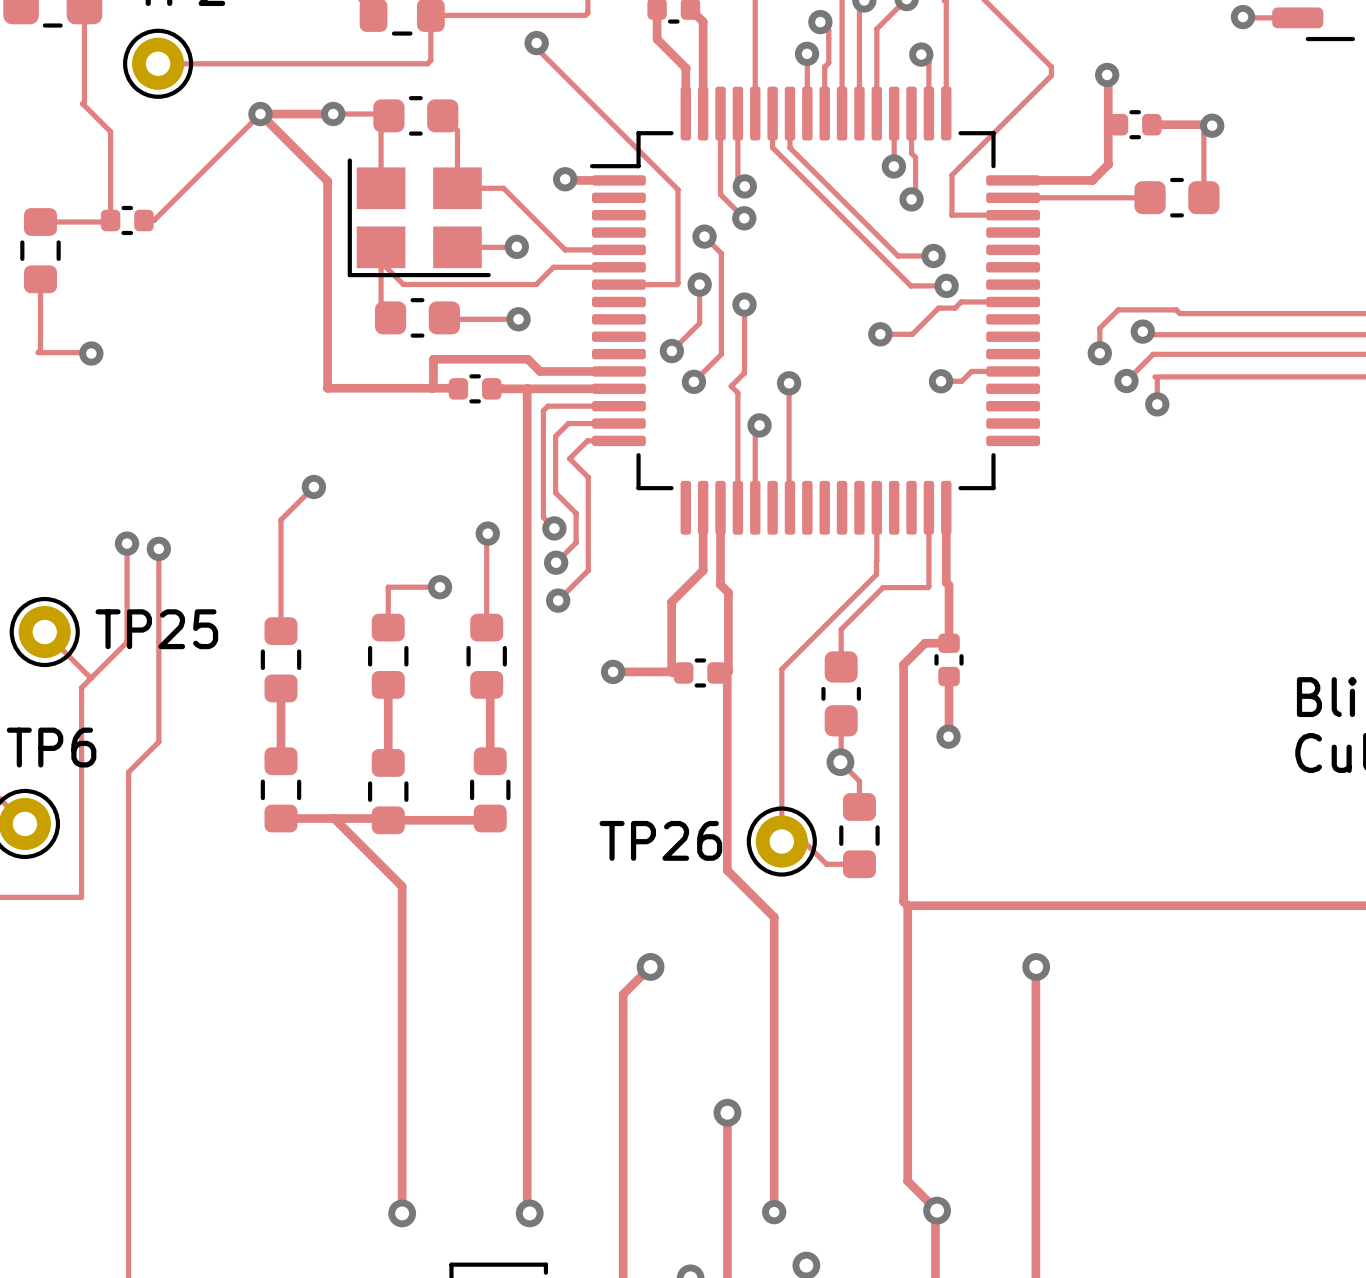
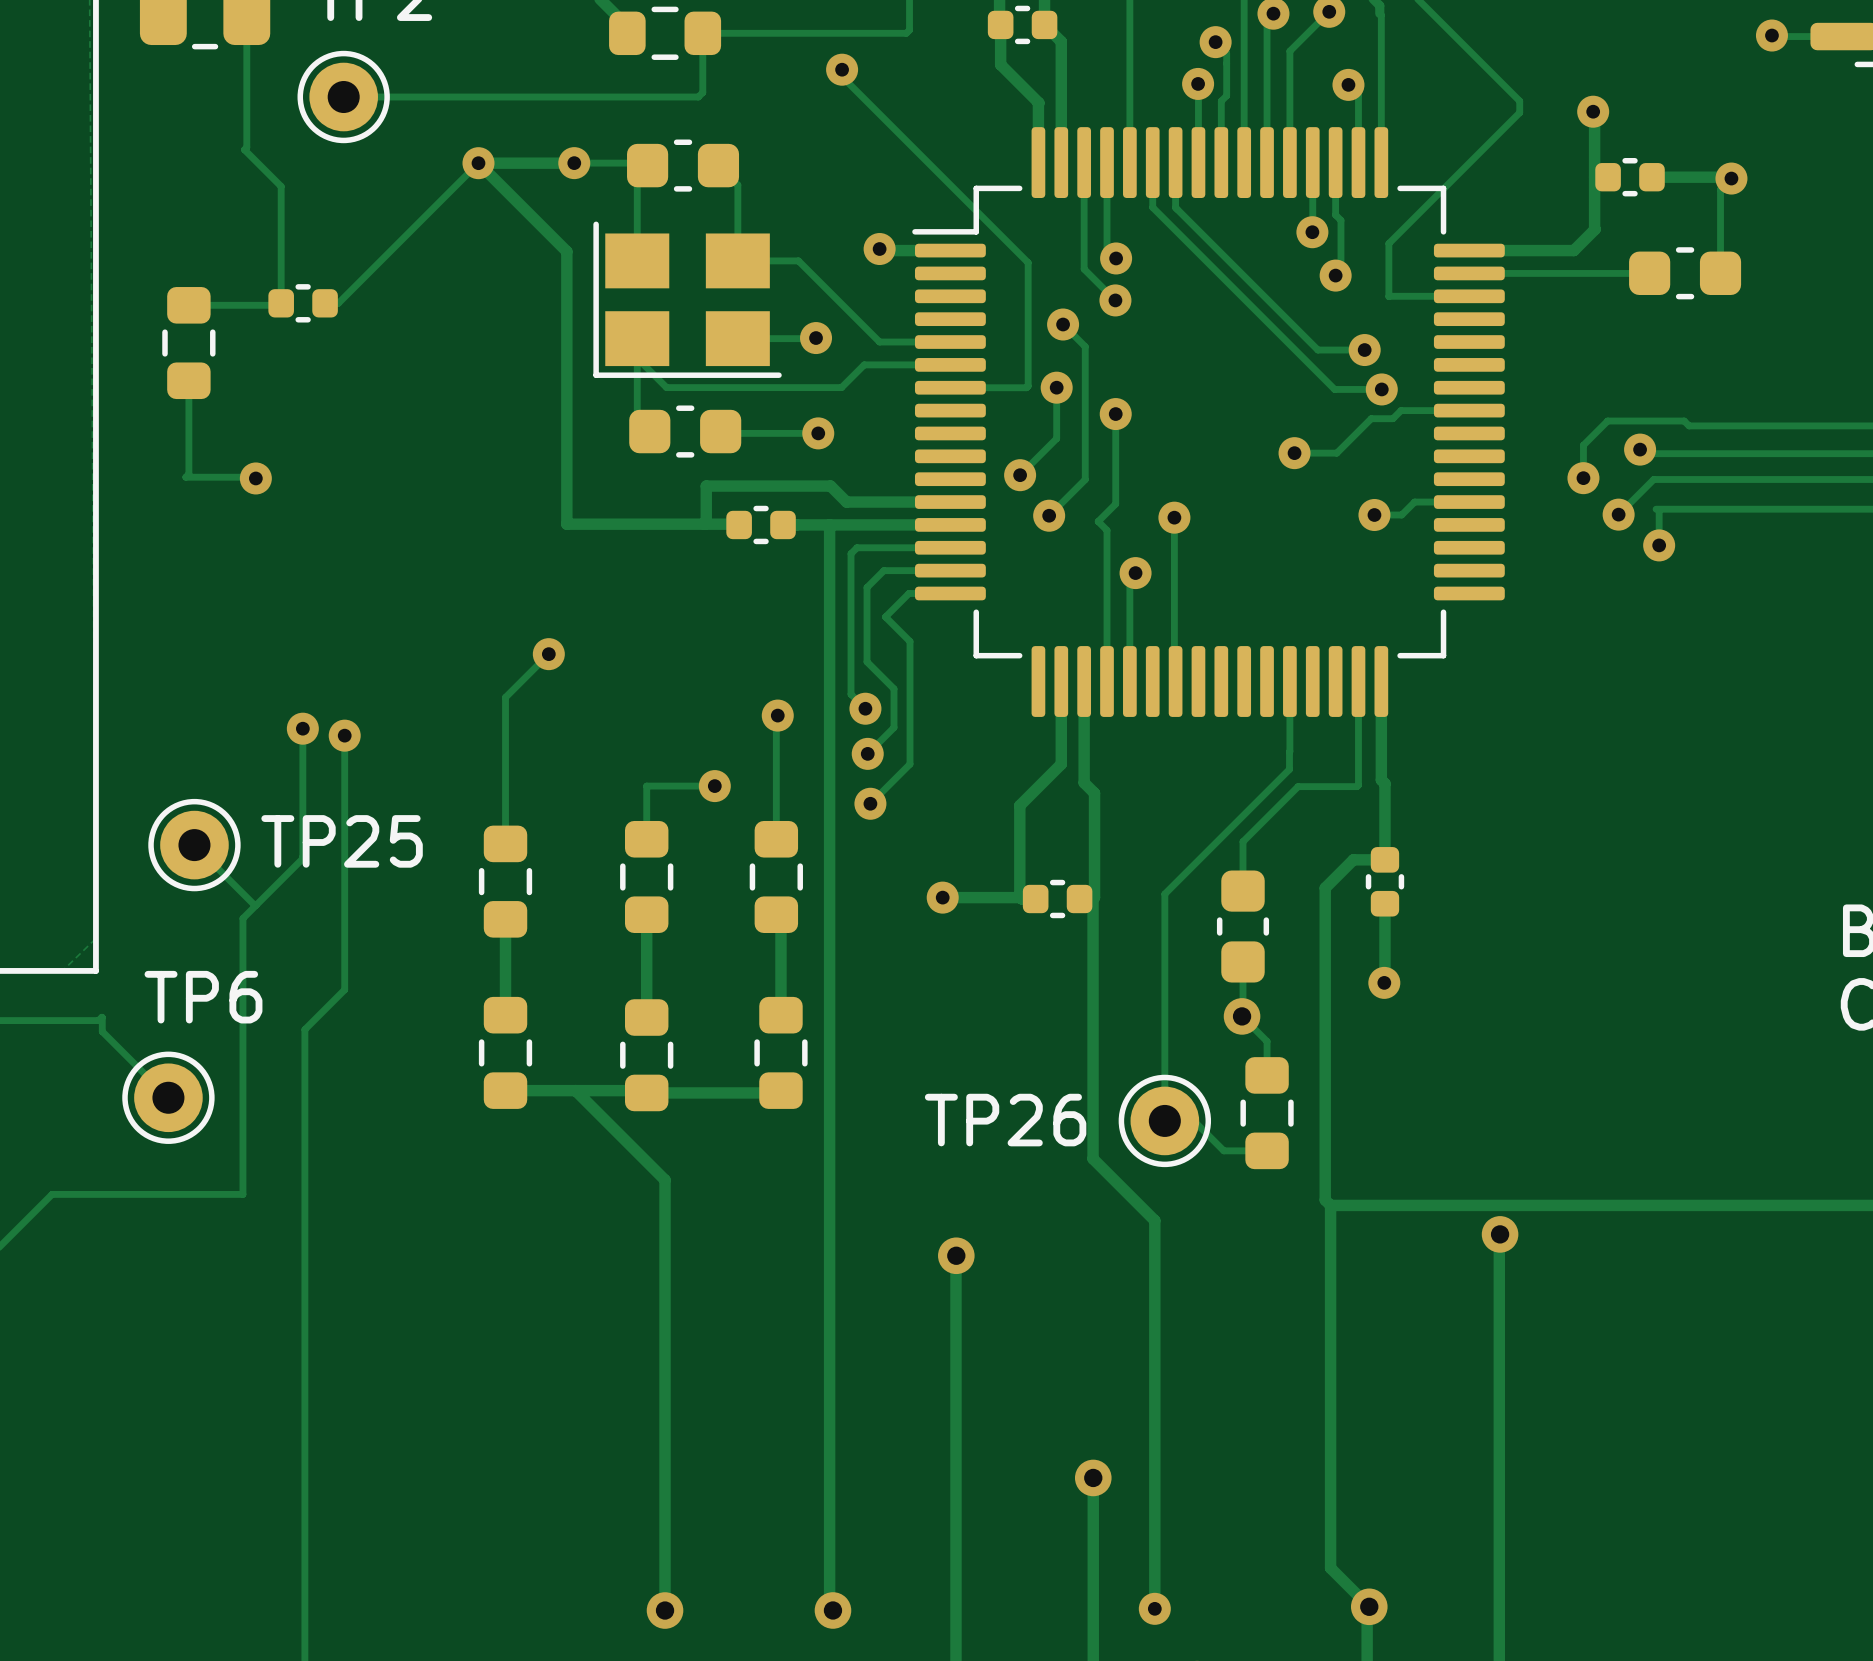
track: none -> (1500, 1234) (1499, 1286)
track: (650, 966) (623, 994) -> (955, 1256) (955, 1322)
via position: (650, 966) -> (956, 1255)
via position: (1036, 966) -> (1500, 1234)

